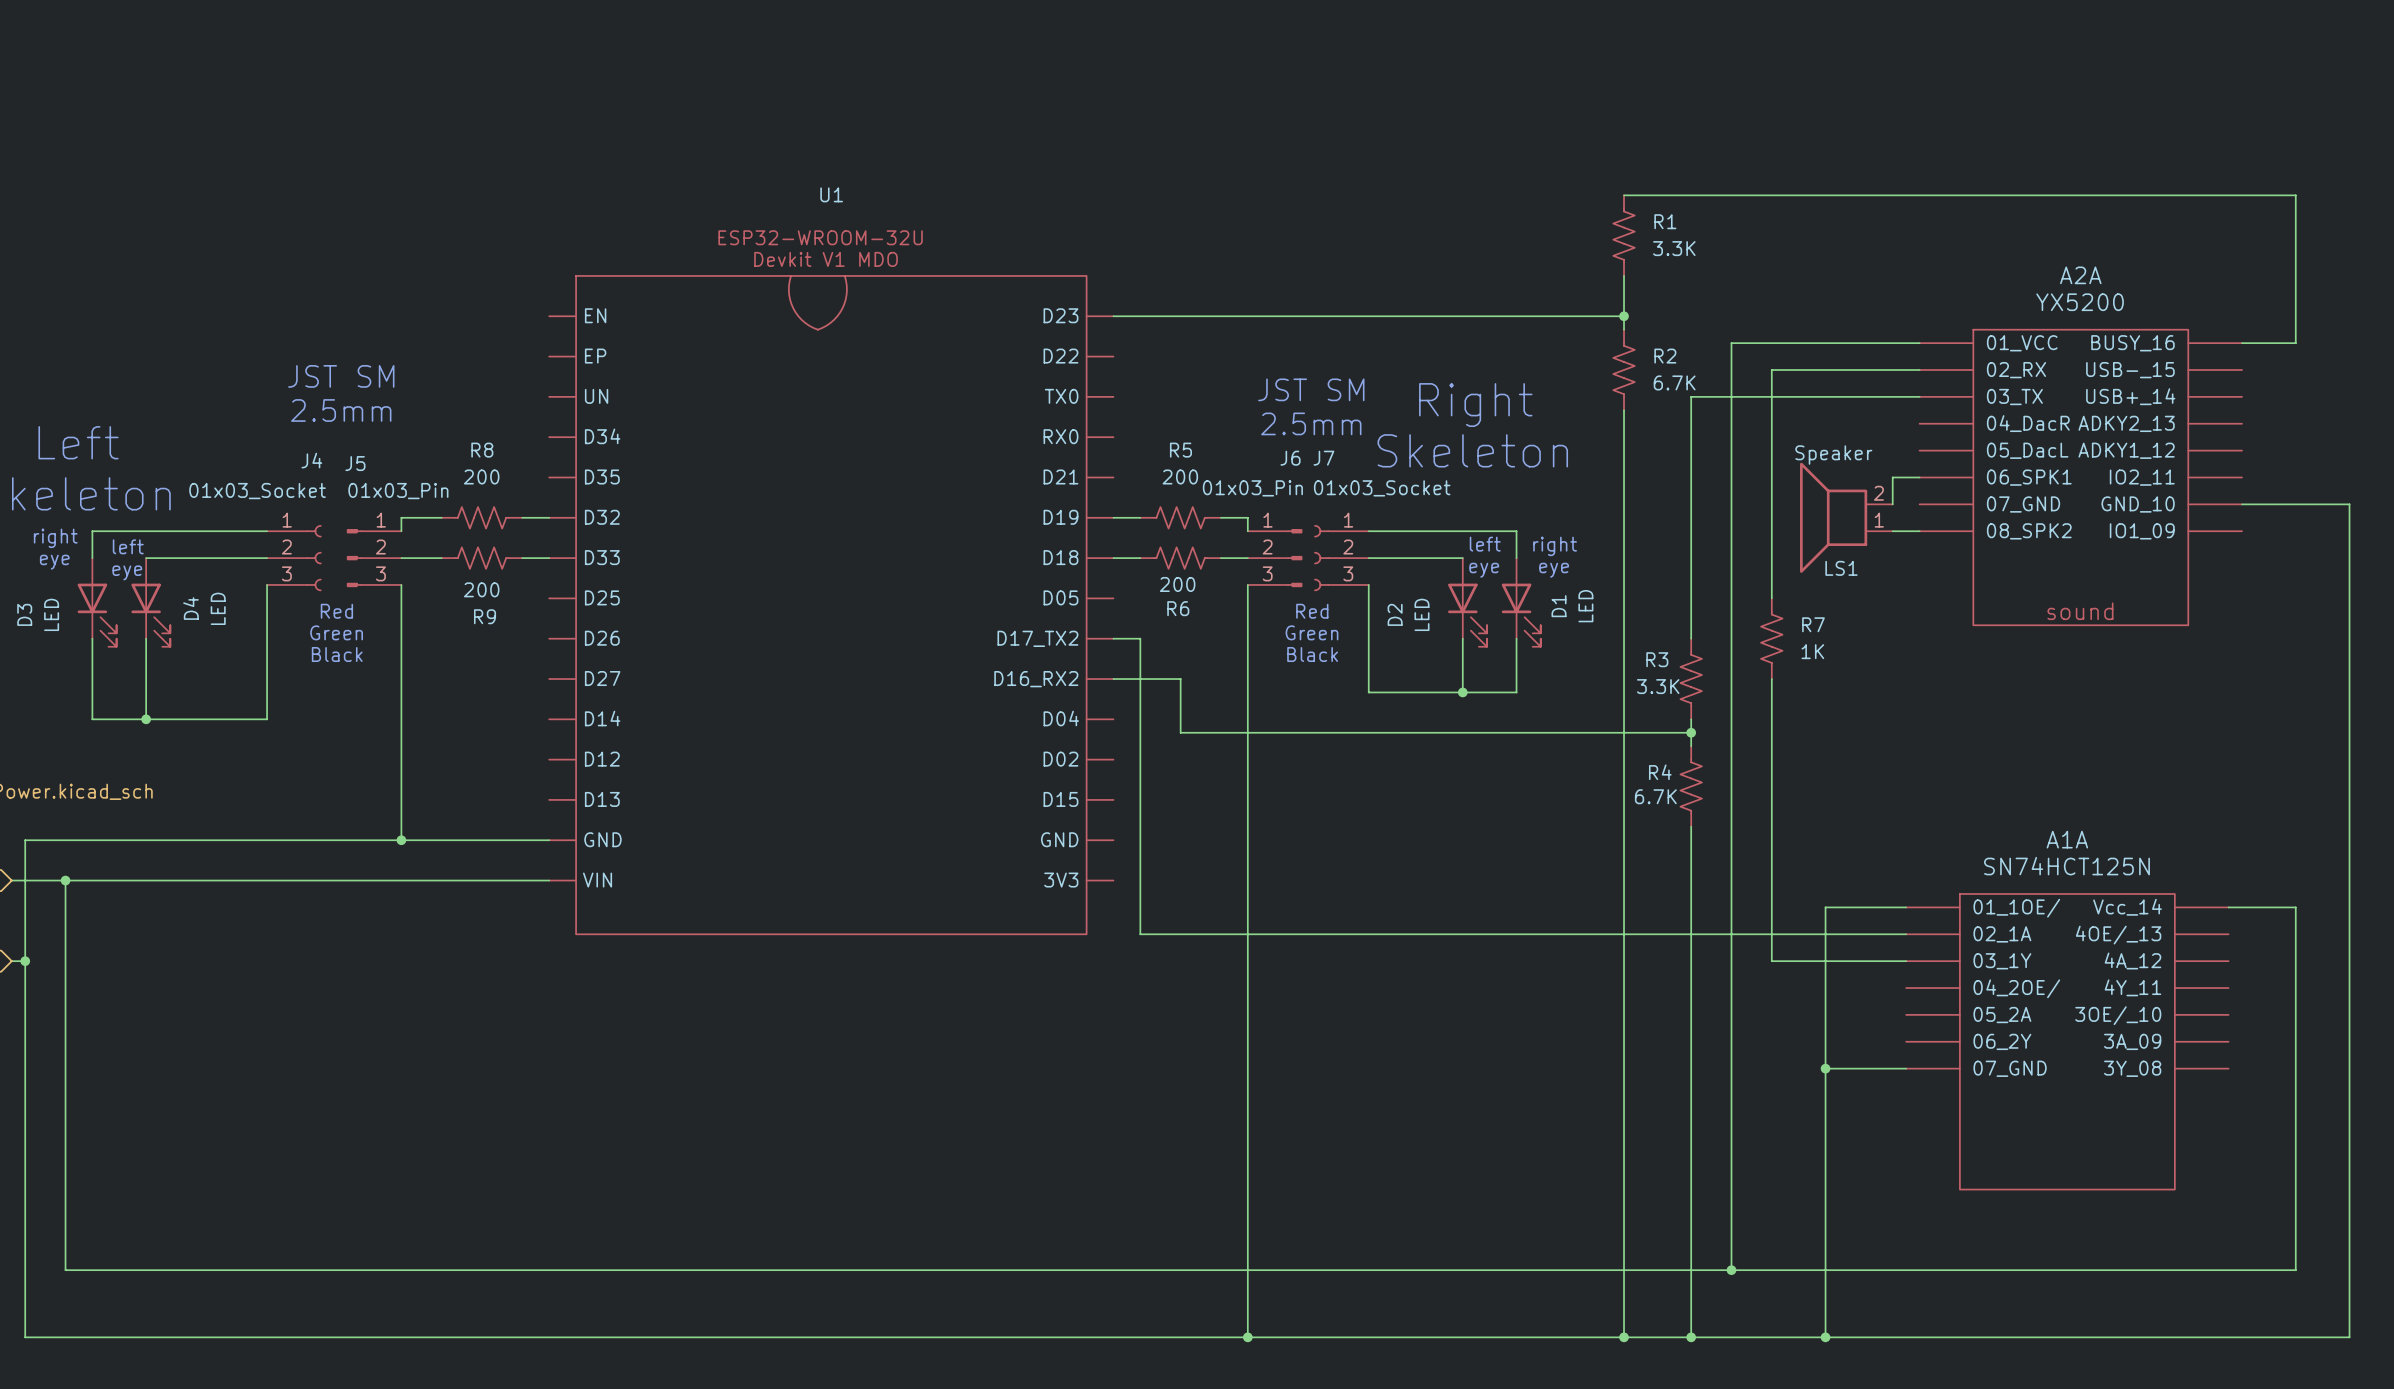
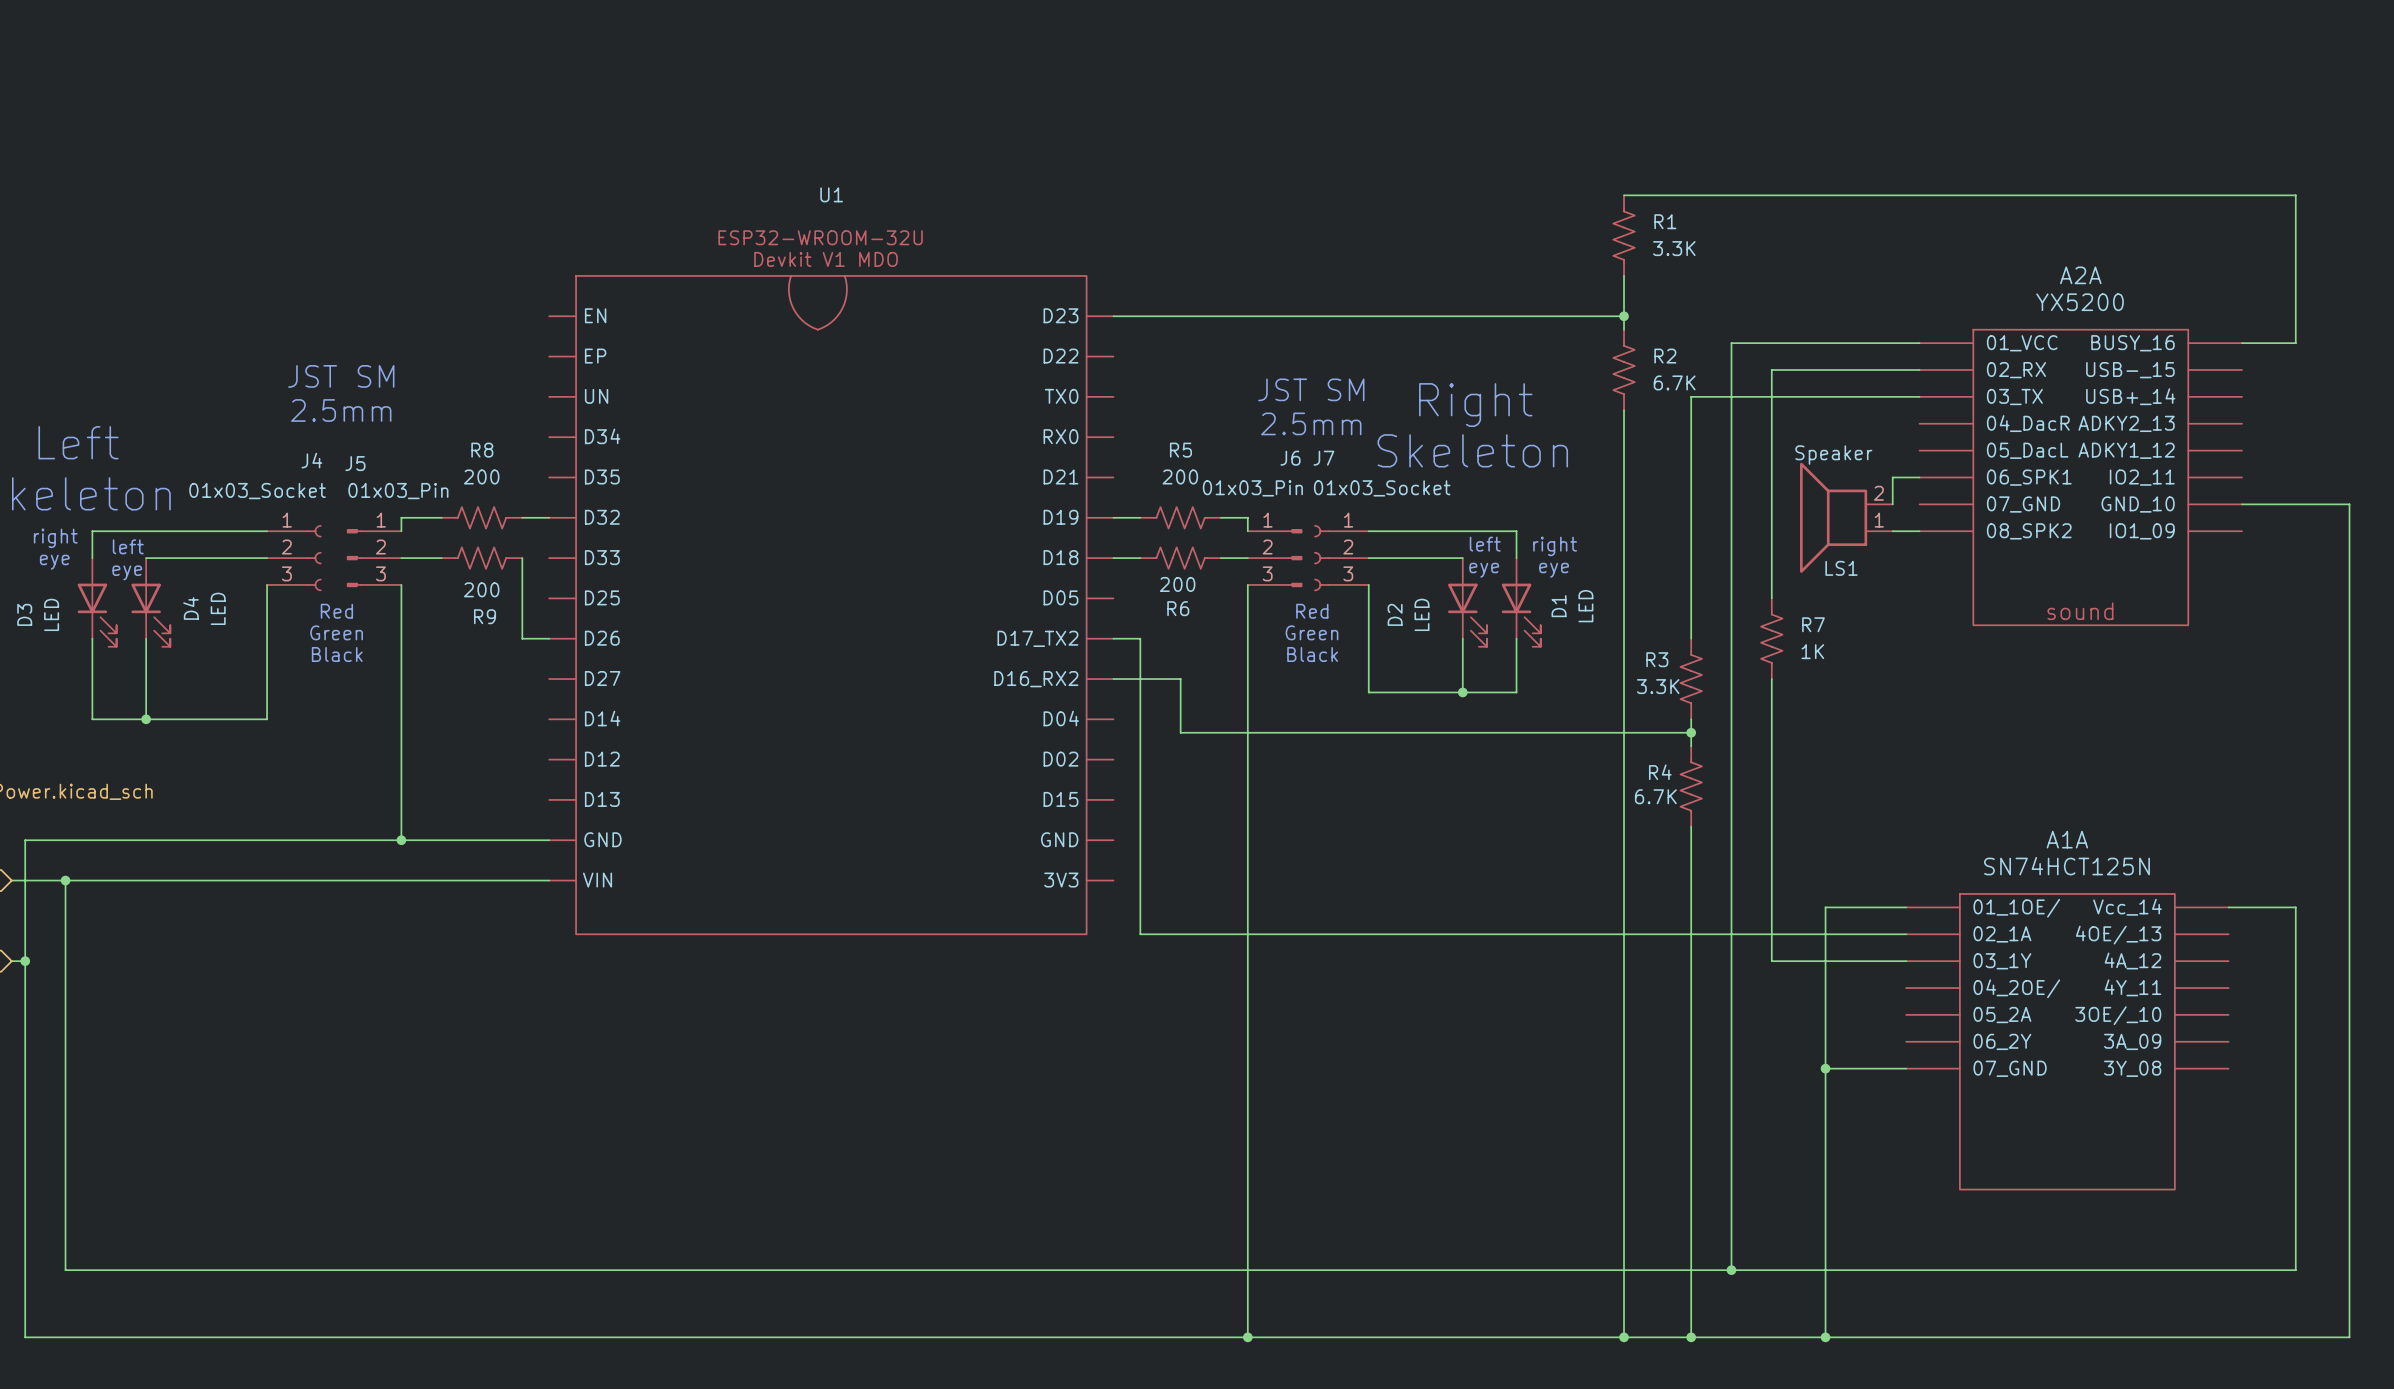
wire: (522, 558) (549, 558) -> (522, 558) (522, 638) (549, 638)

